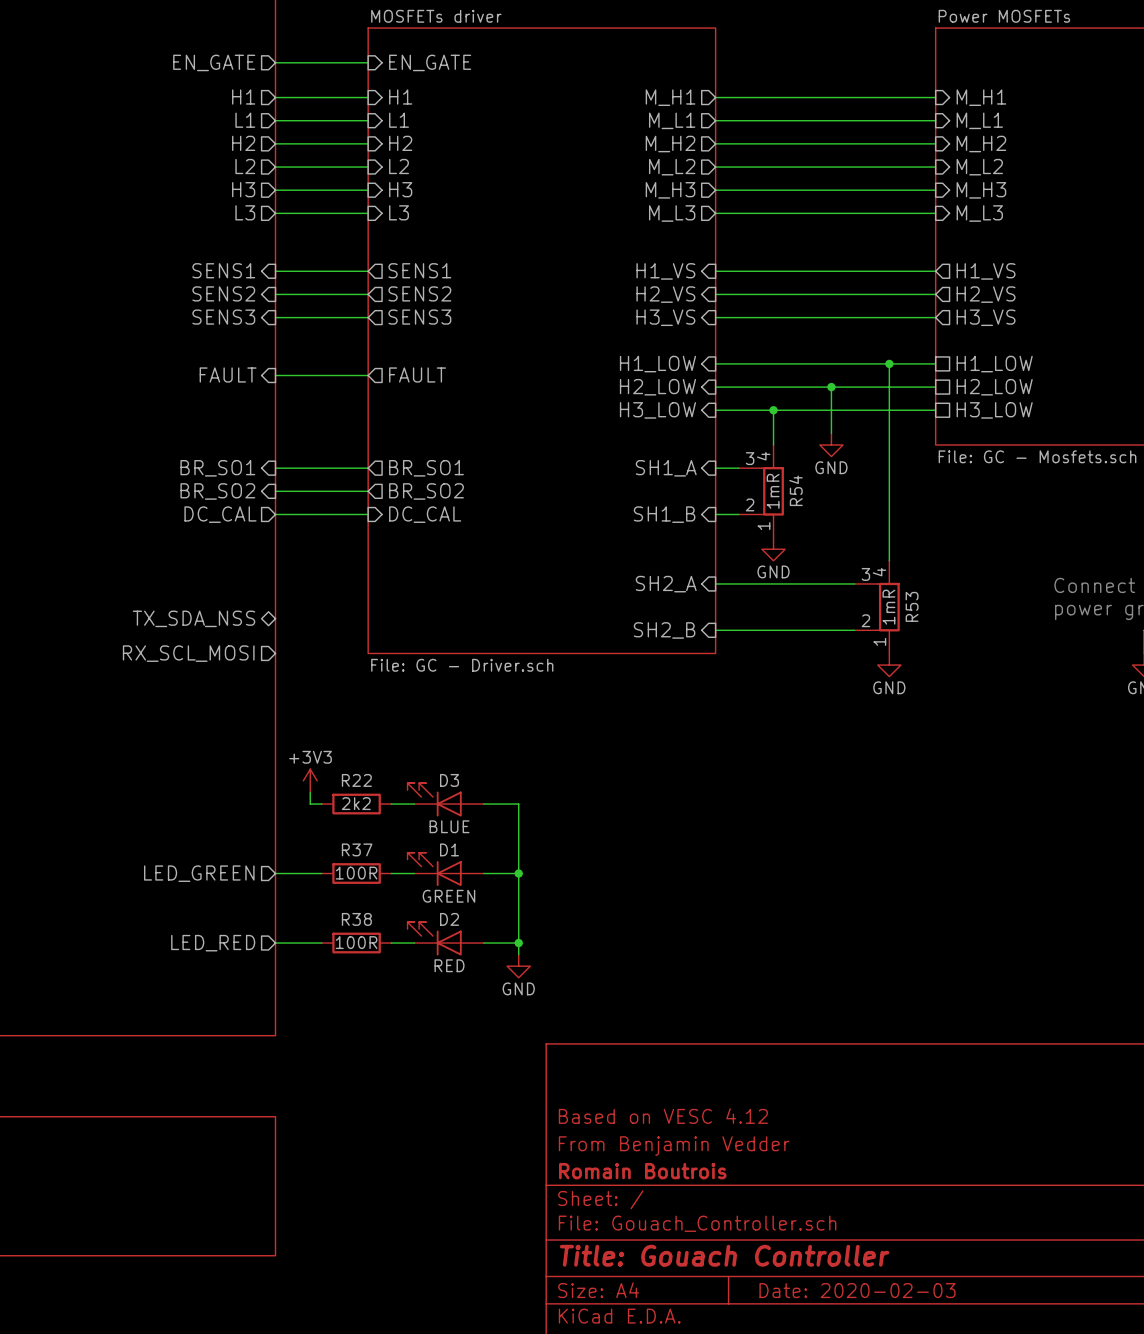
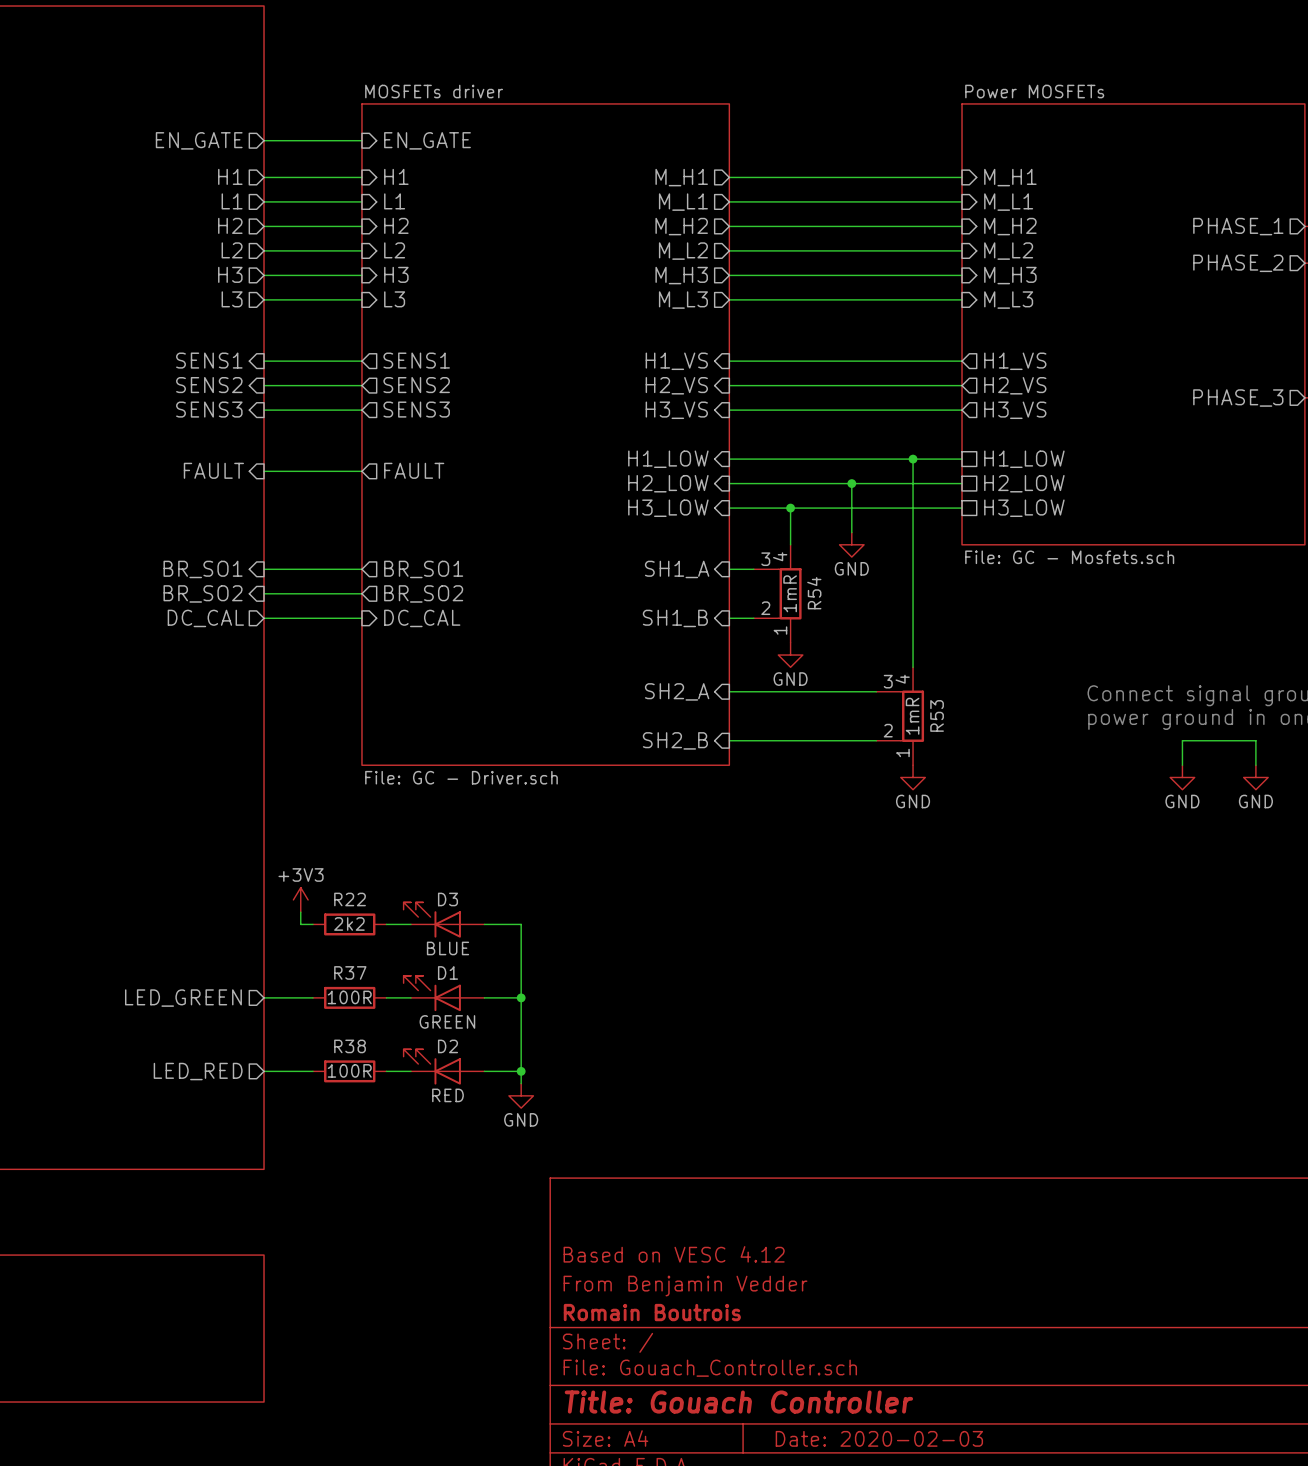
sheet pin: TX_SDA_NSS (194, 618) -> none
sheet pin: RX_SCL_MOSI (188, 653) -> none

